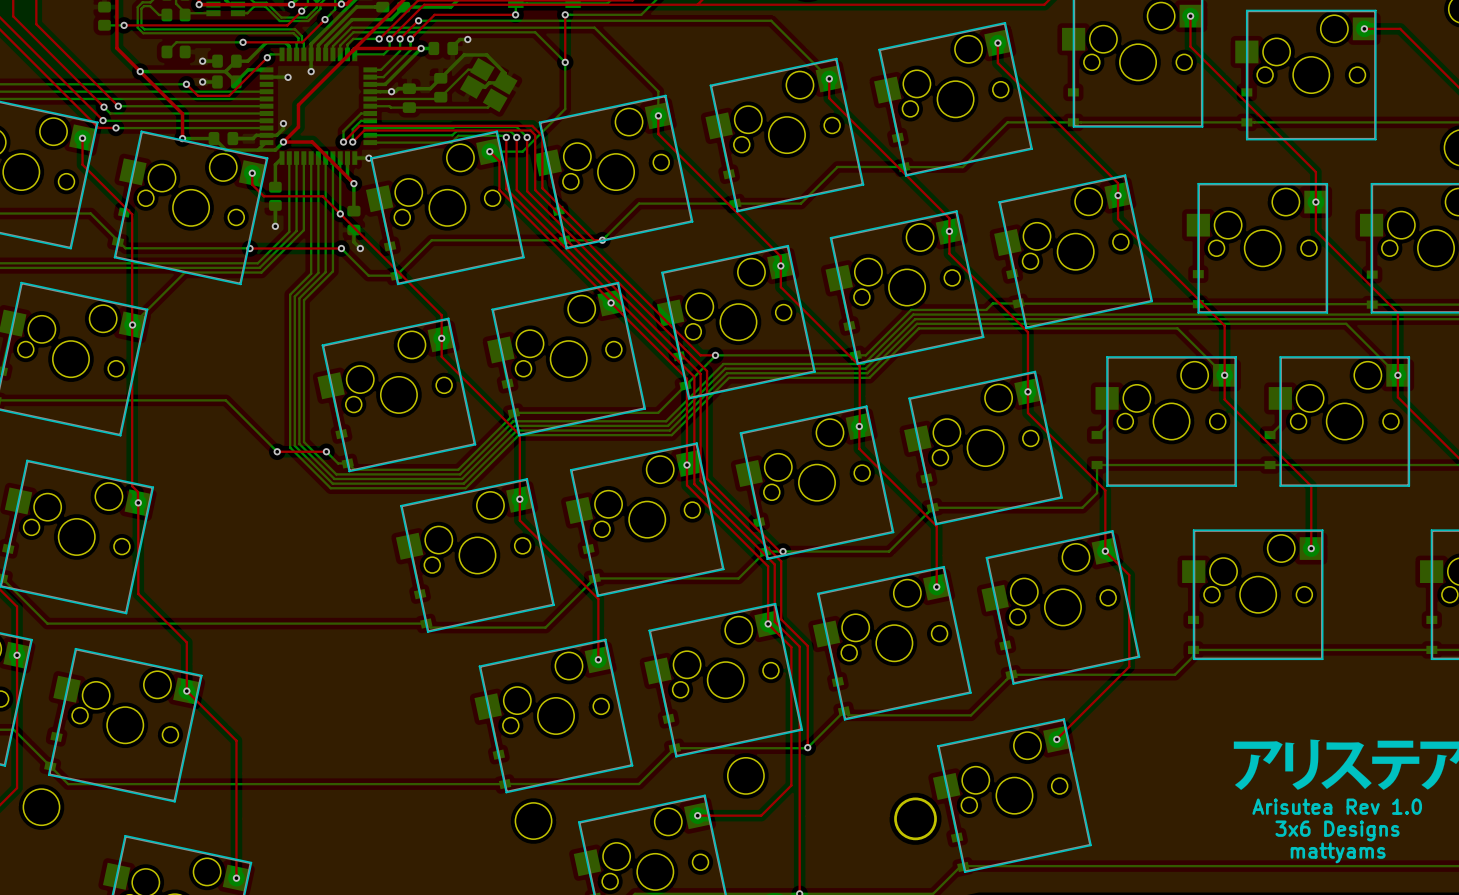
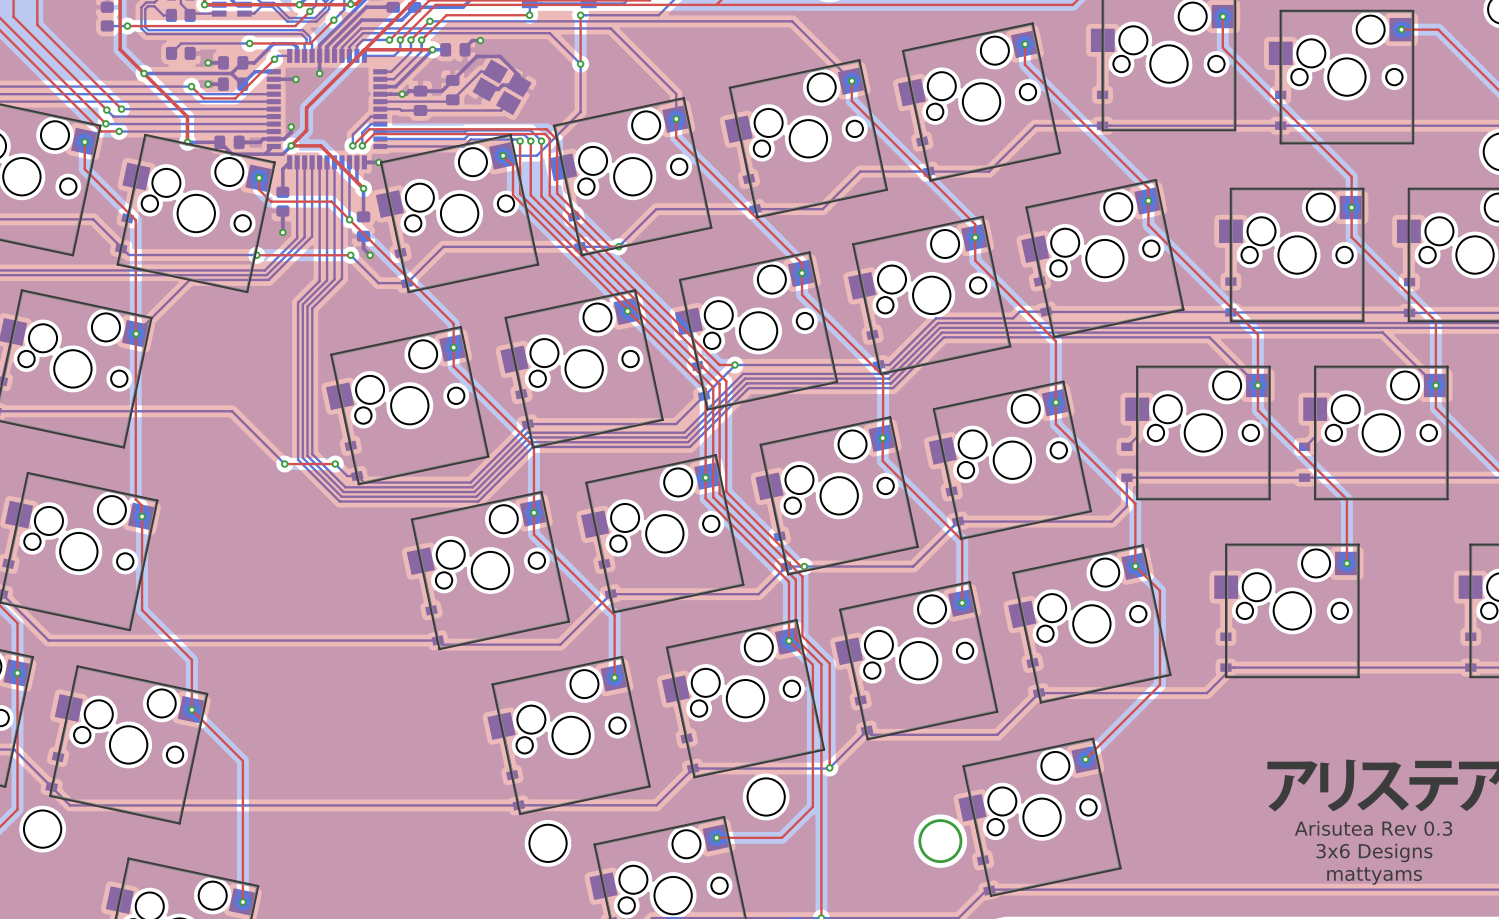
text: Arisutea Rev 1.0 (1337, 806) -> Arisutea Rev 0.3 (1373, 828)

